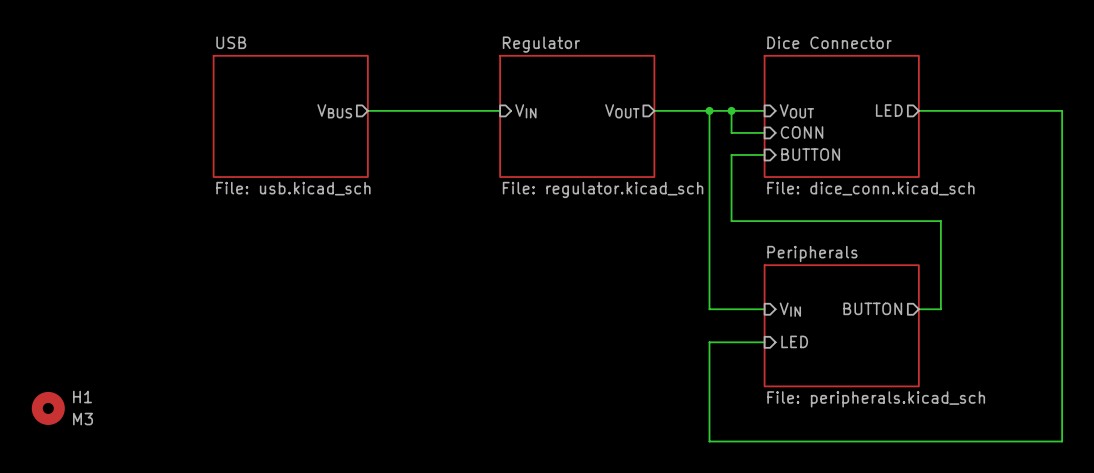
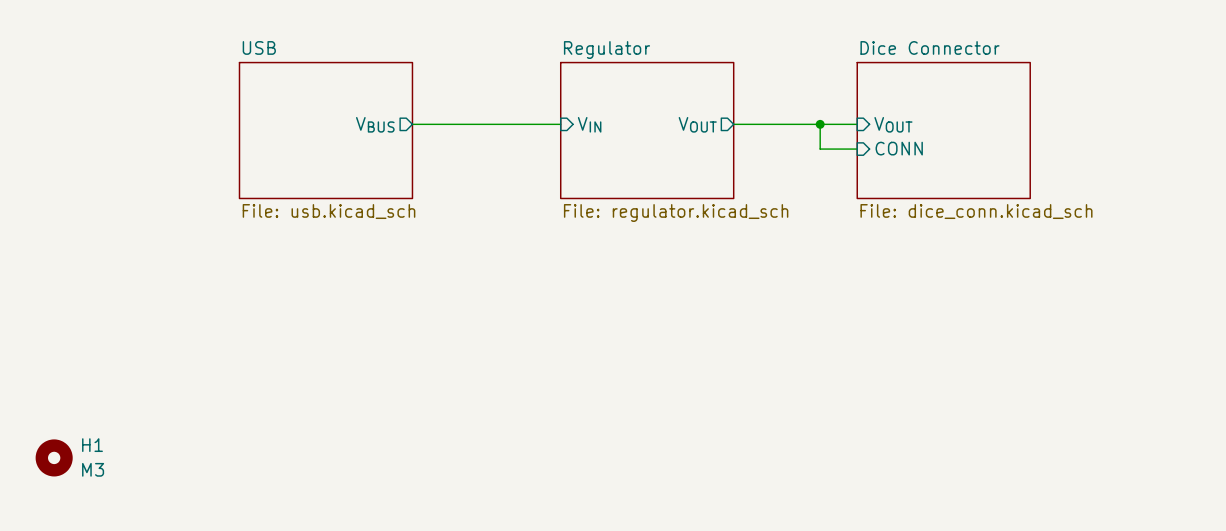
wire: (709, 110) (709, 309) (764, 309) -> none
junction: (709, 110) -> none
sheet pin: LED (889, 110) -> none
wire: (918, 110) (1062, 110) (1062, 441) (709, 441) (709, 342) (764, 342) -> none
wire: (764, 154) (731, 154) (731, 221) (940, 221) (940, 309) (918, 309) -> none
sheet pin: BUTTON (810, 154) -> none
sheet pin: BUTTON (872, 308) -> none
sheet pin: VIN (790, 309) -> none
sheet Peripherals: File: peripherals.kicad_sch (841, 325) -> none
sheet pin: LED (794, 341) -> none

